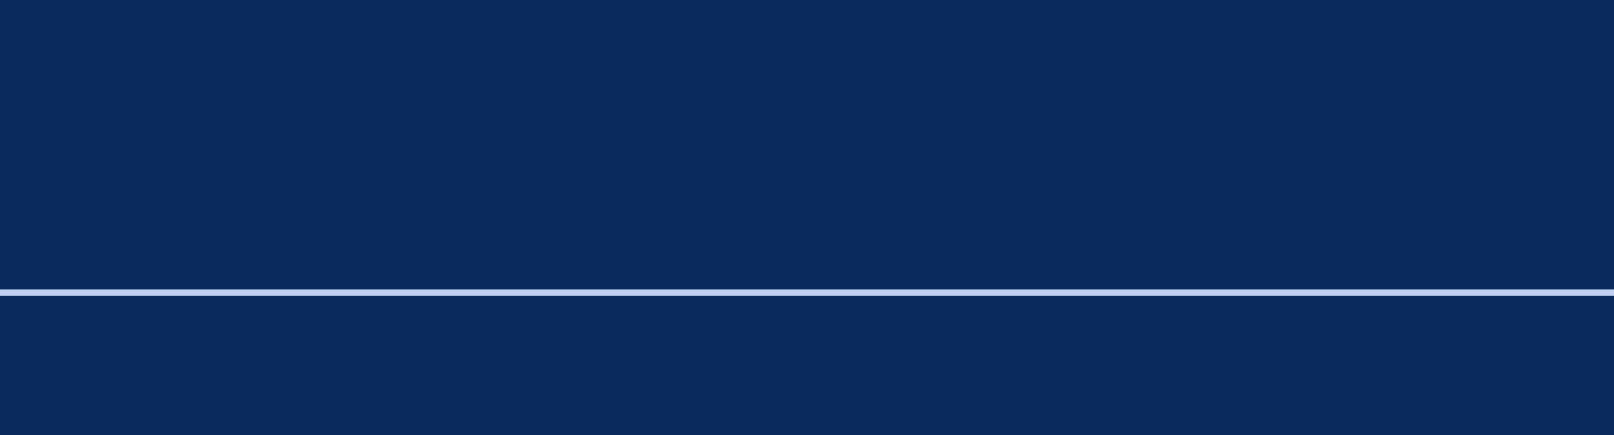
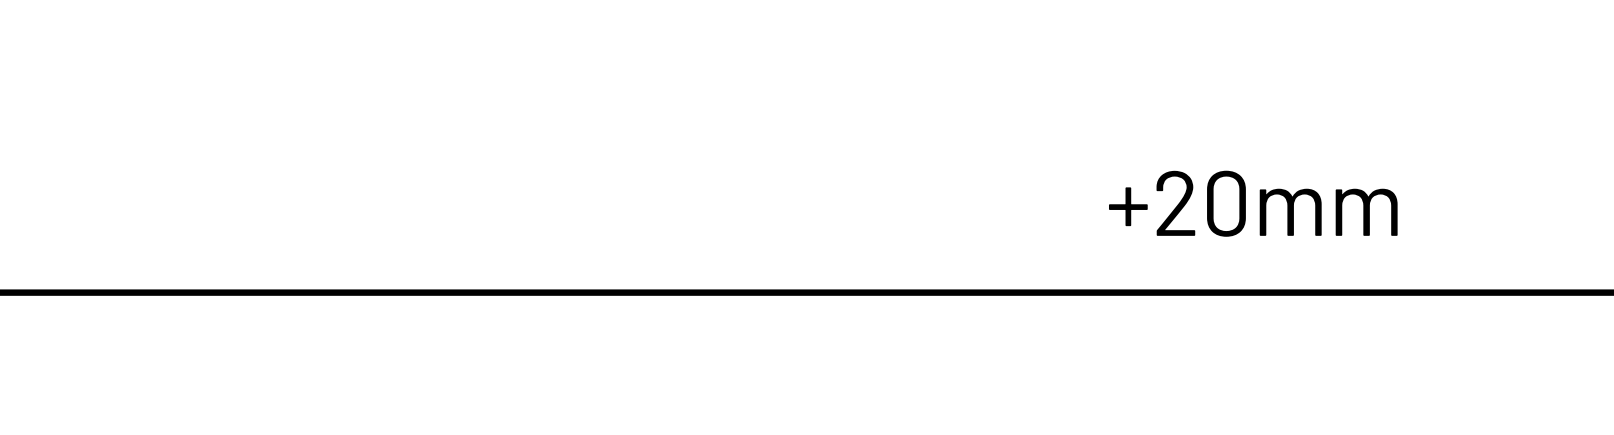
text: none -> +20mm (1253, 203)

